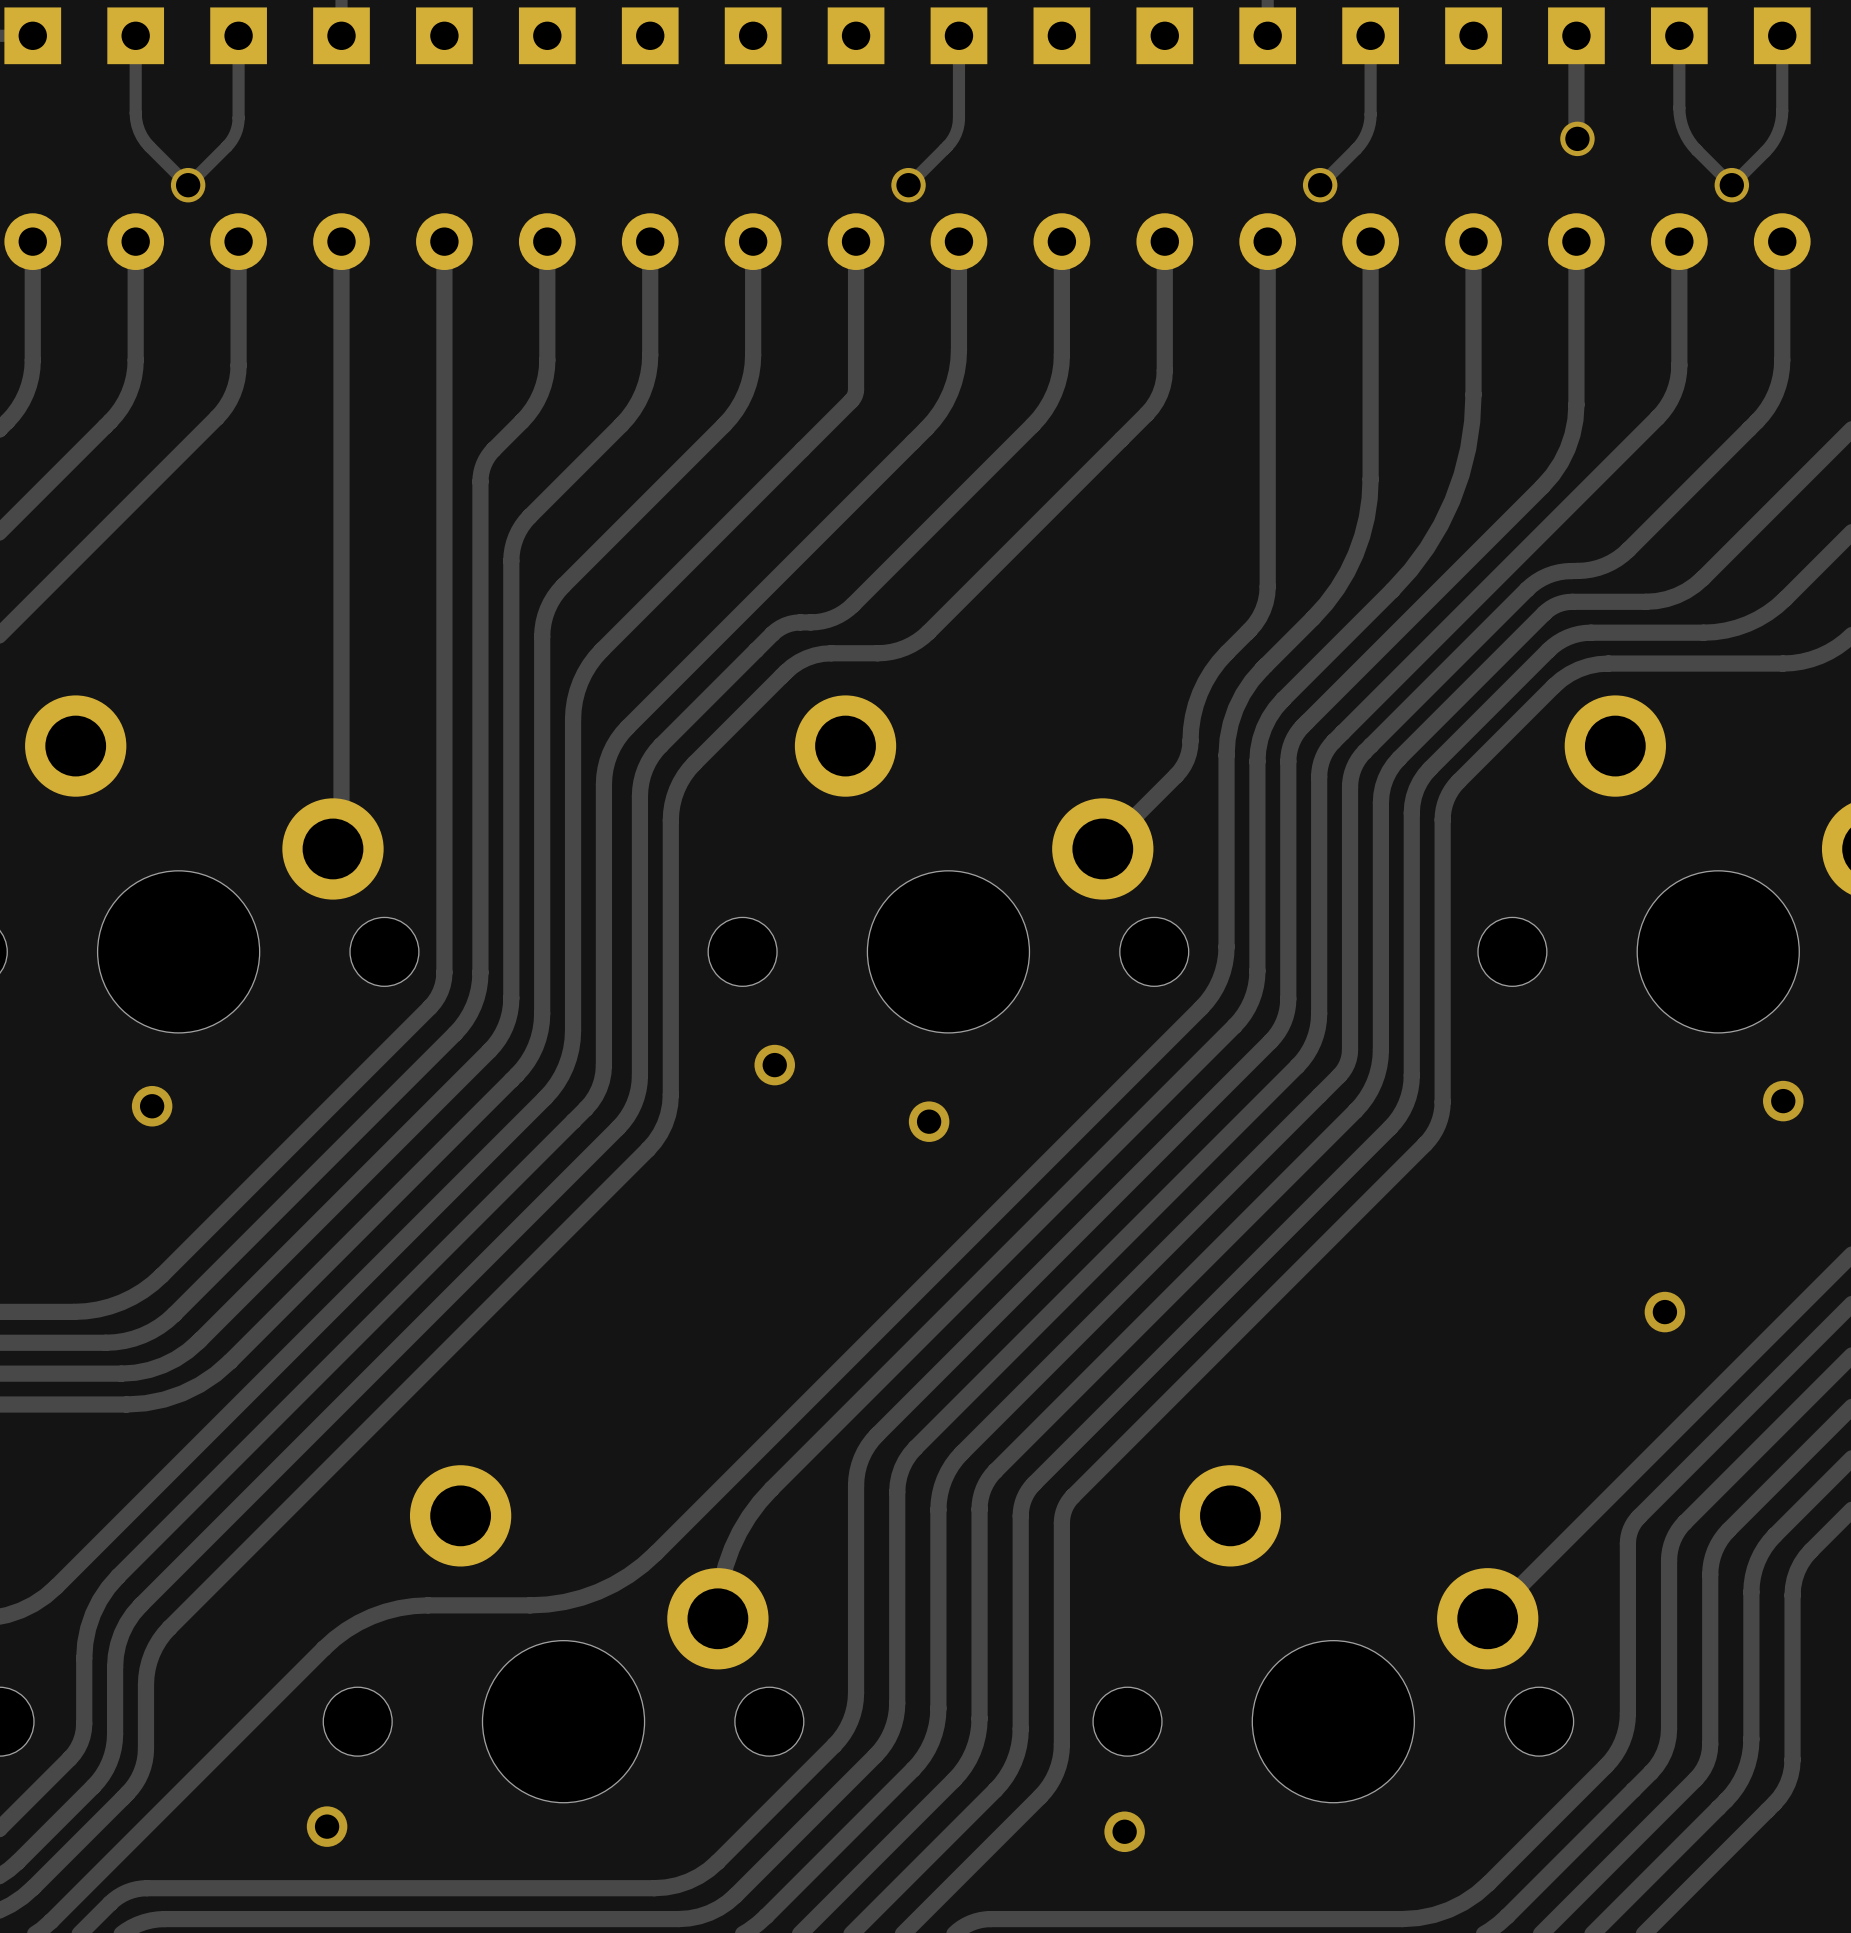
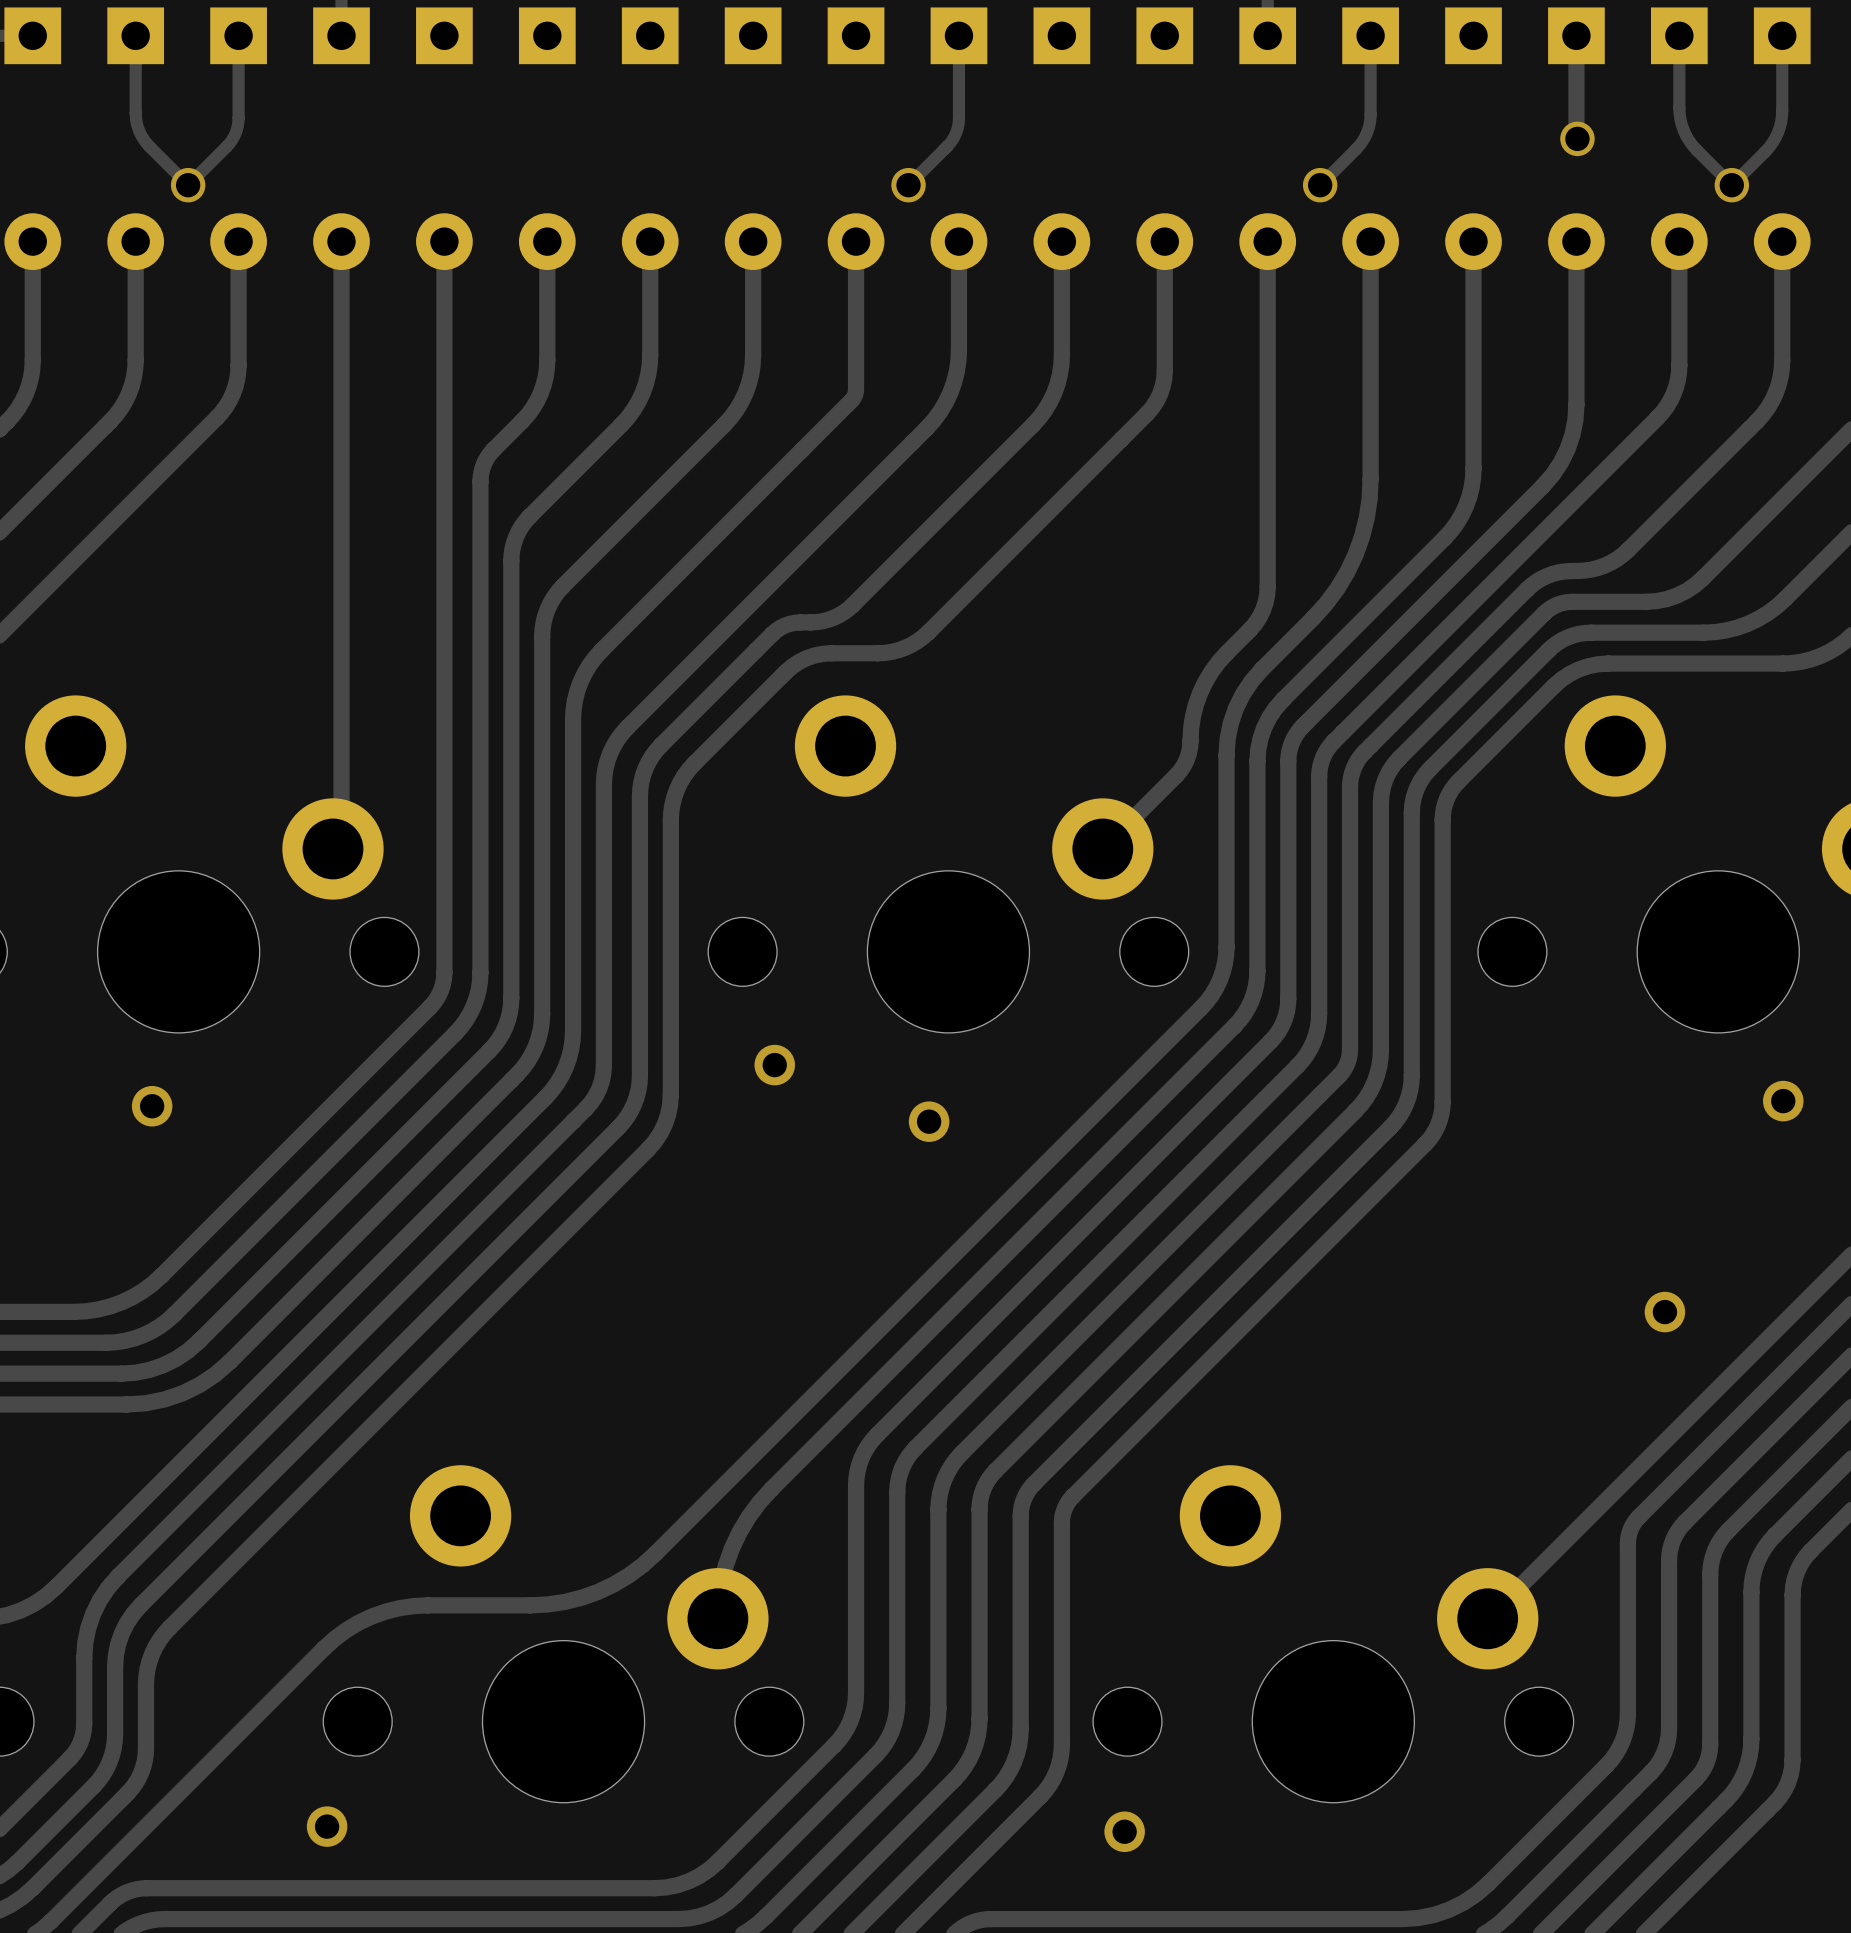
track: (1473, 394) (1468, 448) (1452, 500) (1426, 548) (1392, 590) -> (1473, 394) (1473, 477) (1466, 506) (1451, 530) (1392, 590)

